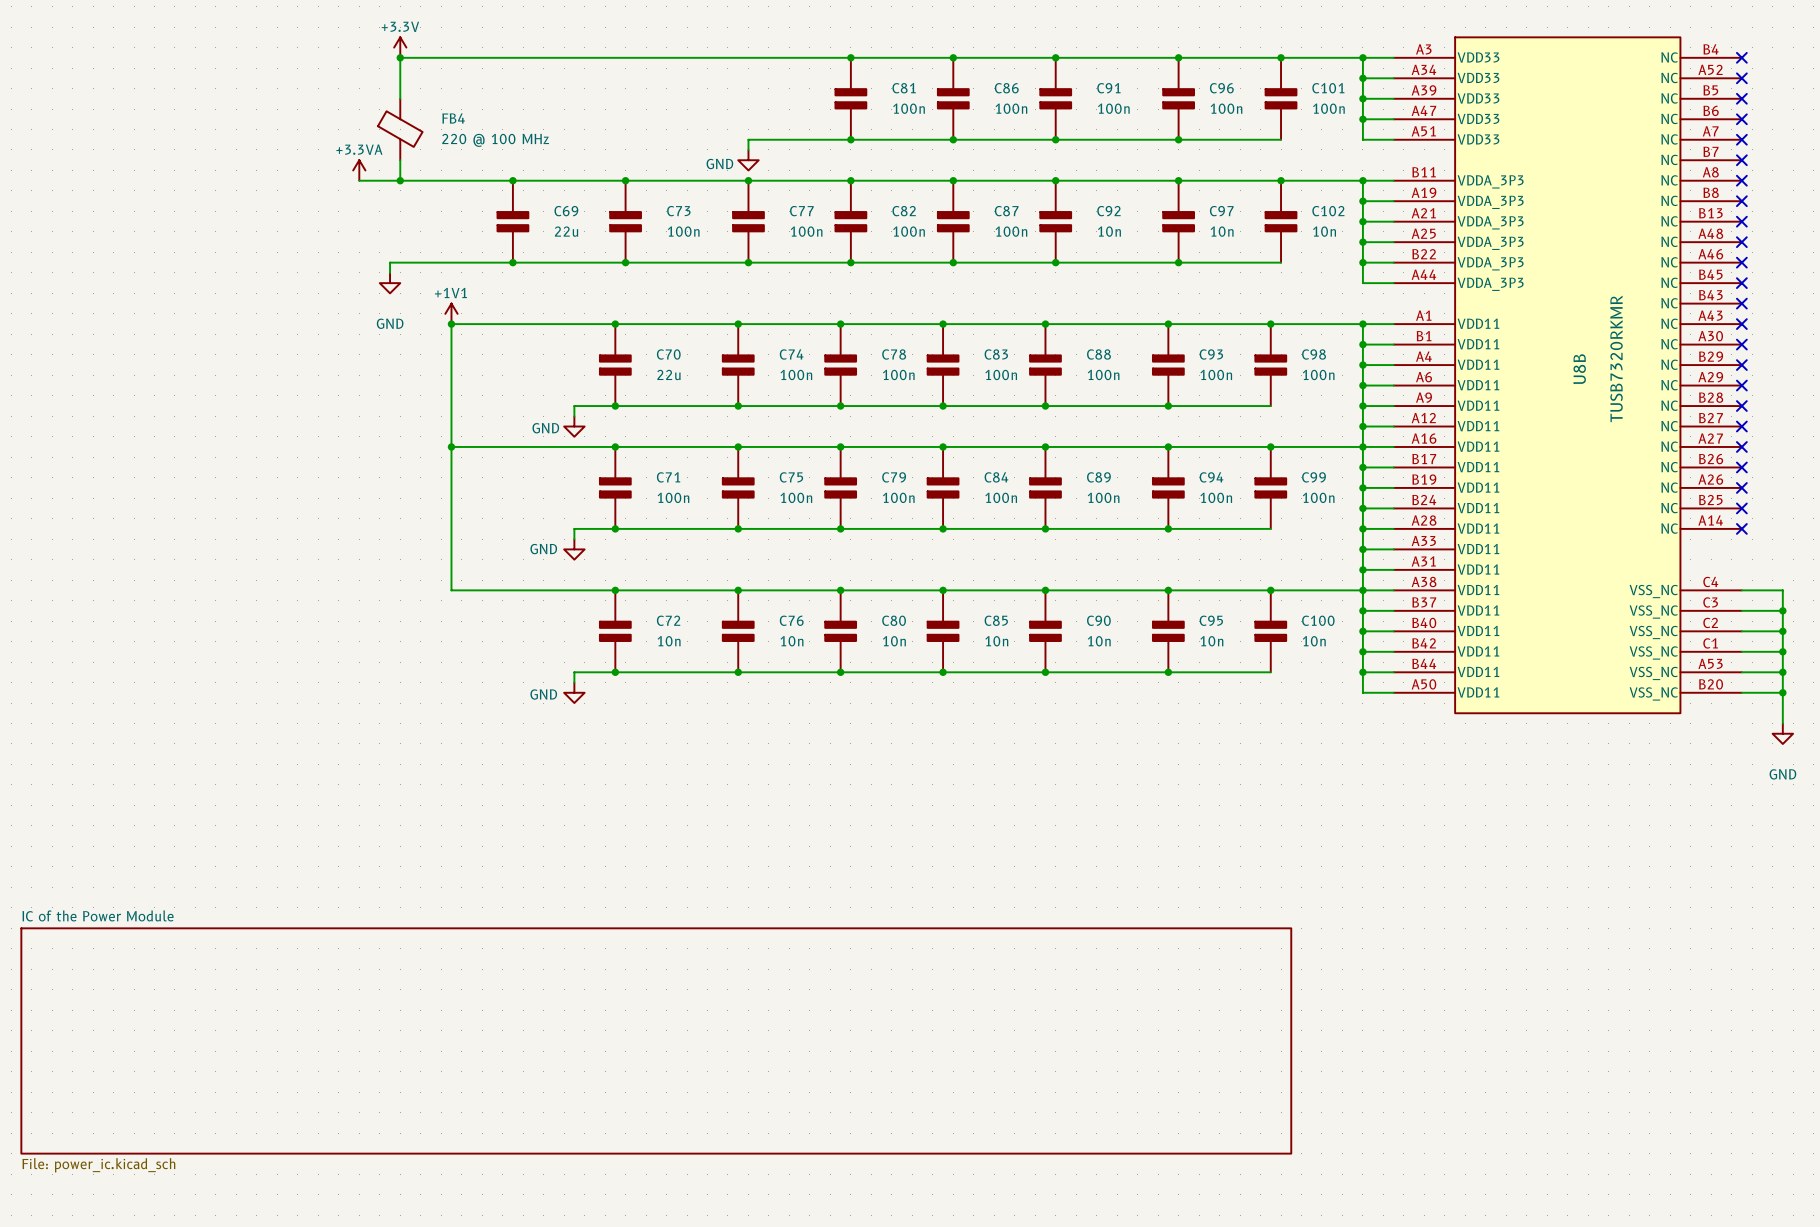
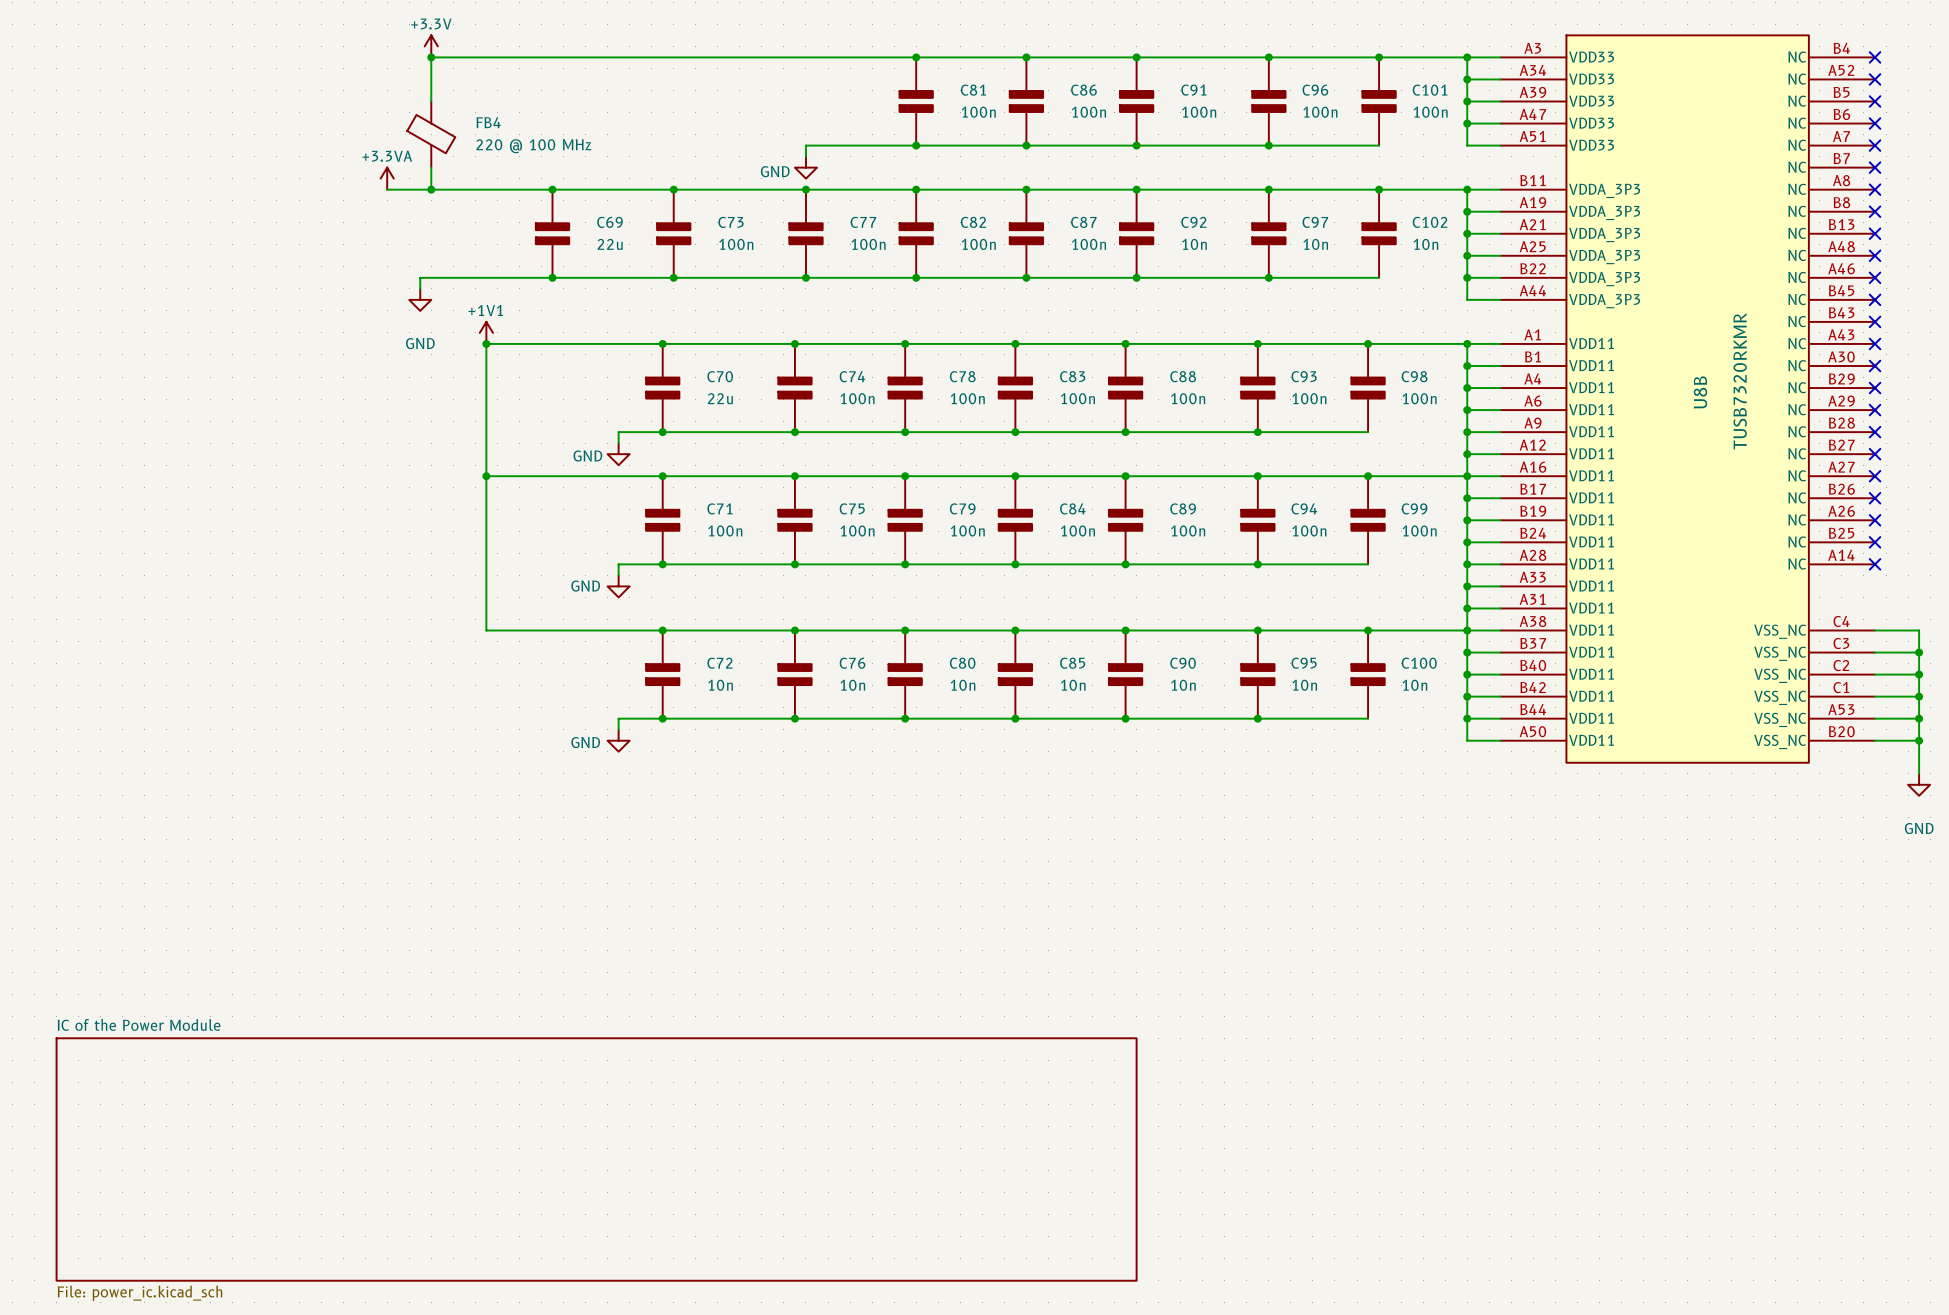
sheet IC of the Power Module: File: power_ic.kicad_sch (656, 1040) -> none
sheet IC of the Power Module: none -> File: power_ic.kicad_sch (596, 1159)

